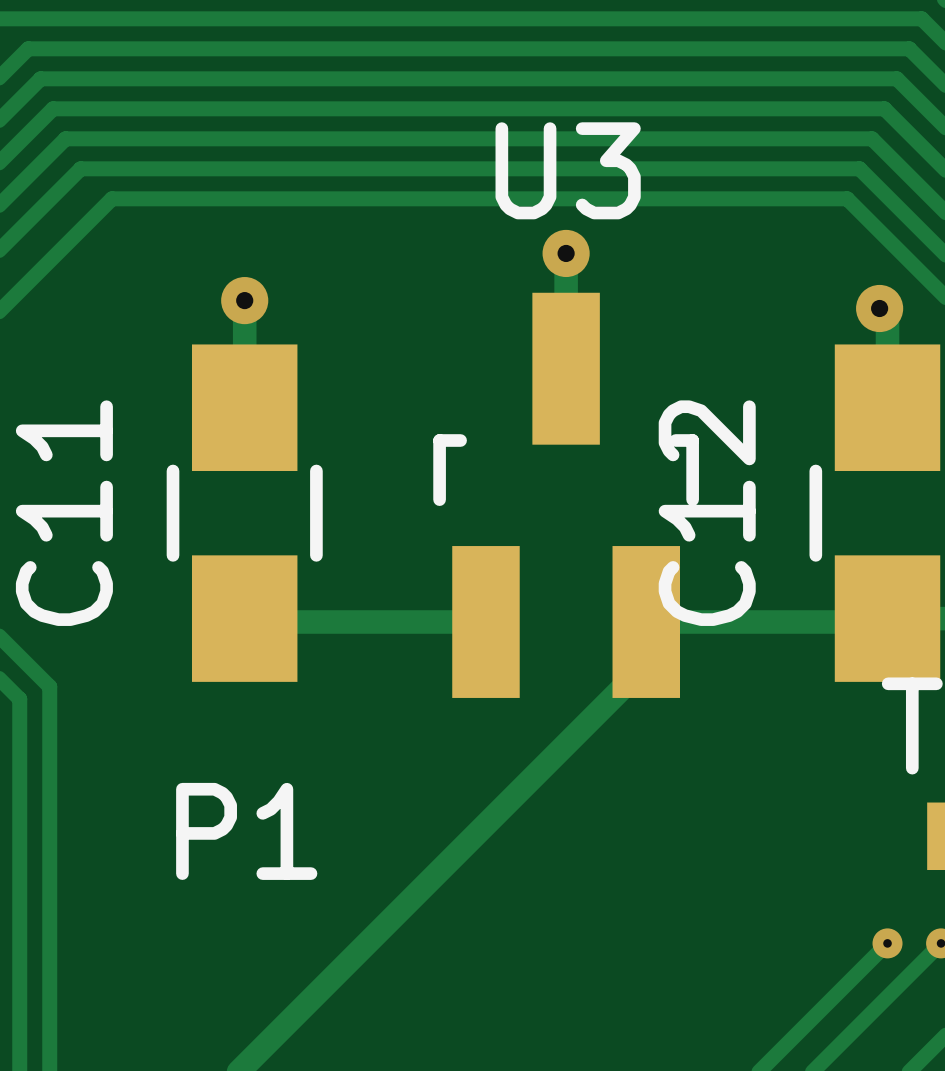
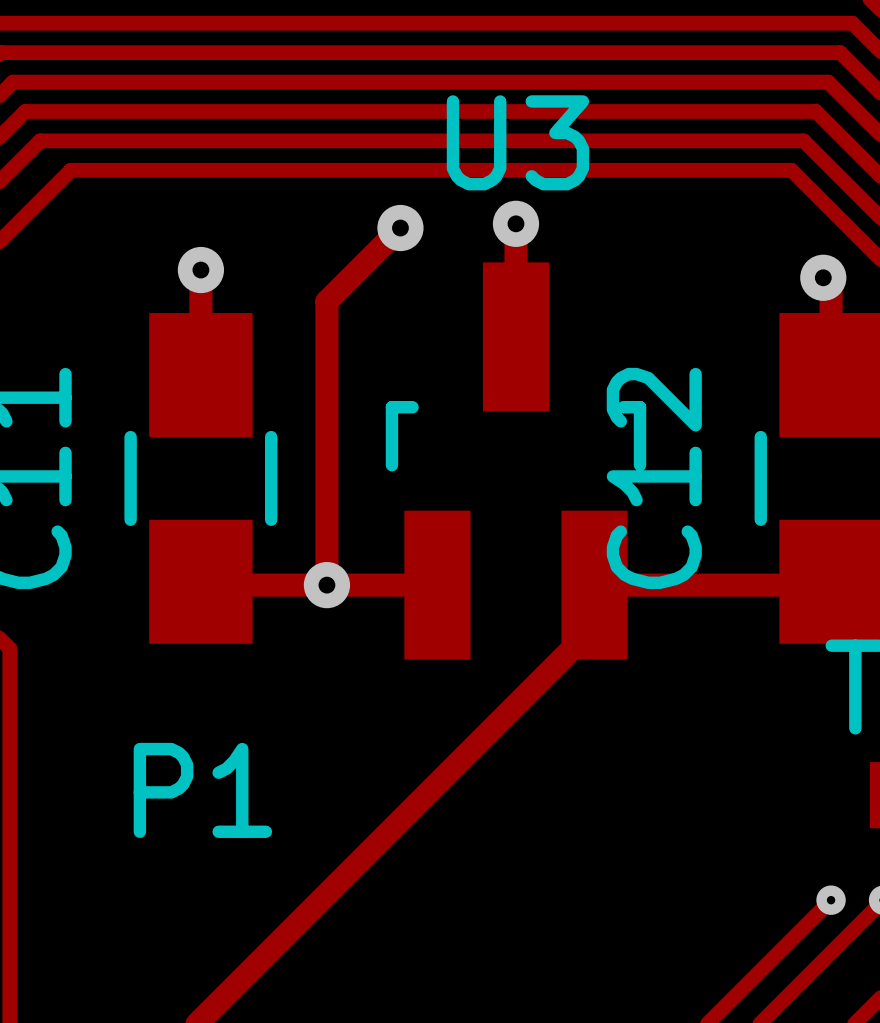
track: none -> (400, 228) (326, 301) (326, 585)
via: none -> (400, 228)
via: none -> (326, 585)

